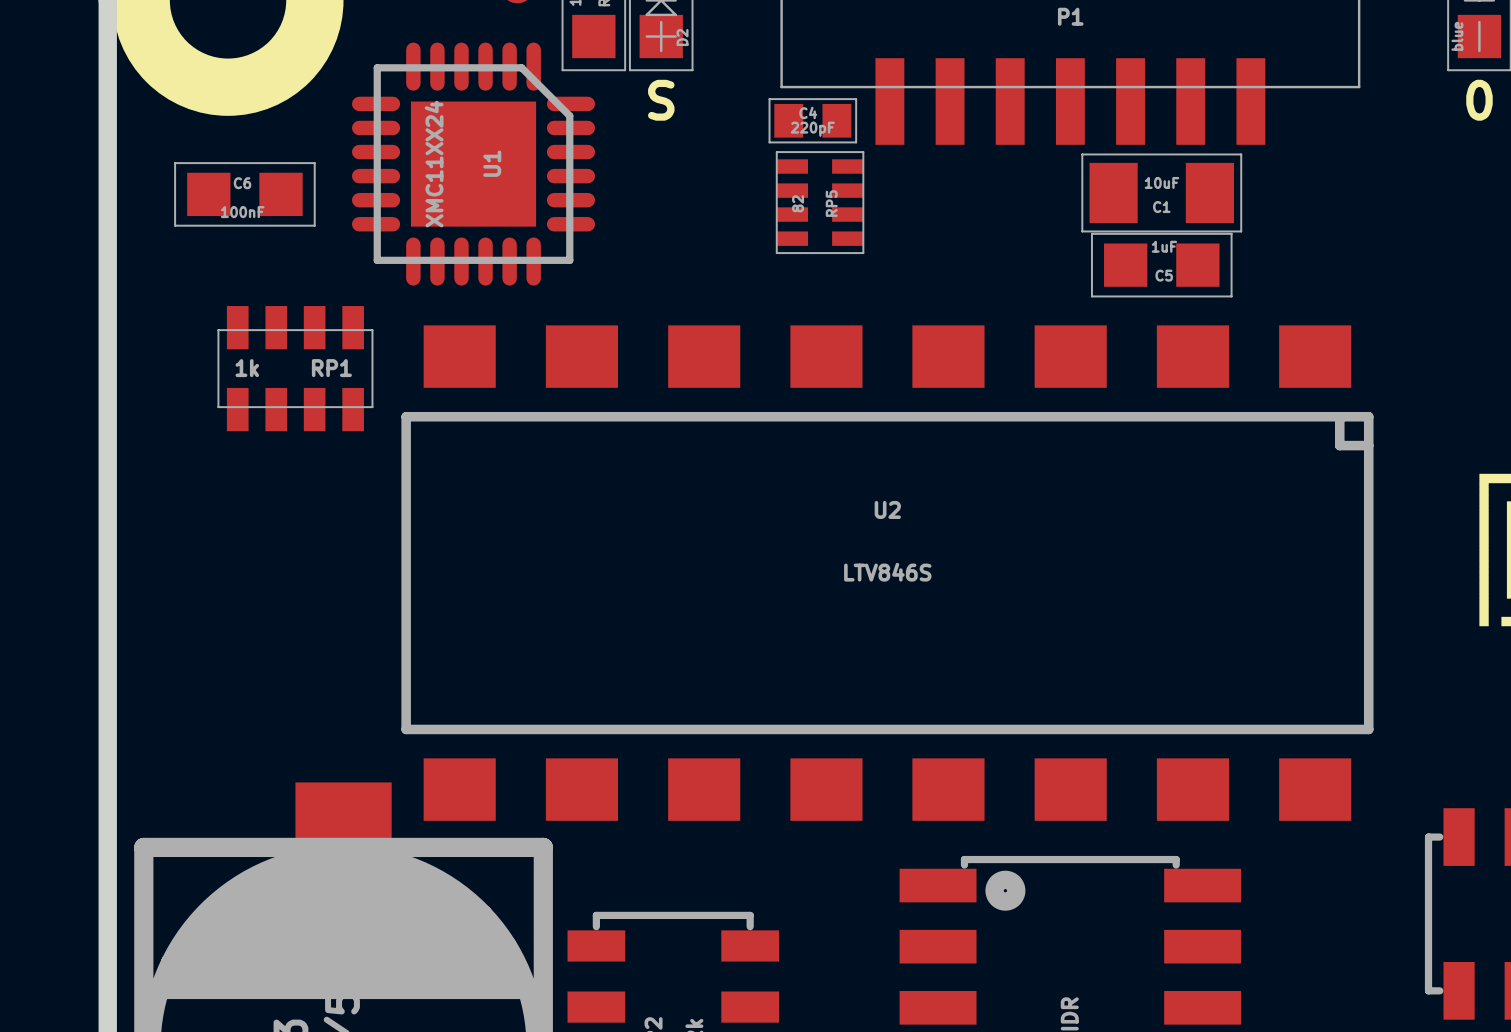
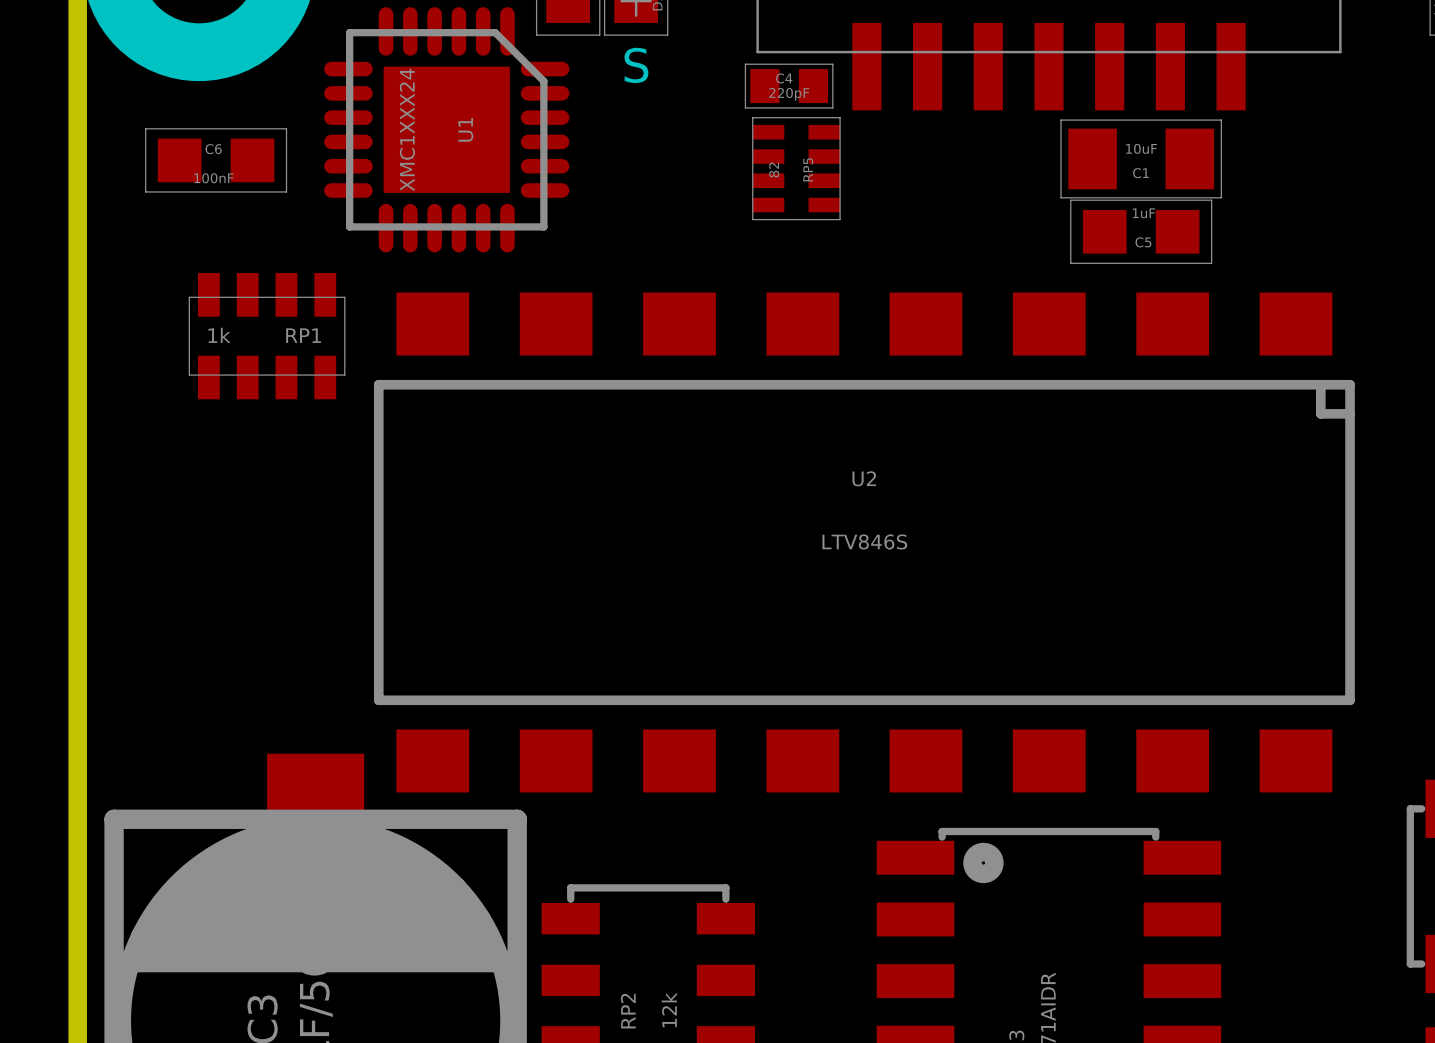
U1 value: XMC11XX24 (434, 164) -> XMC1XXX24 (407, 130)

